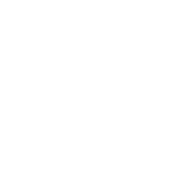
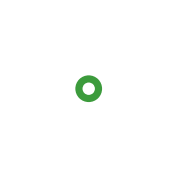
via: none -> (88, 88)

